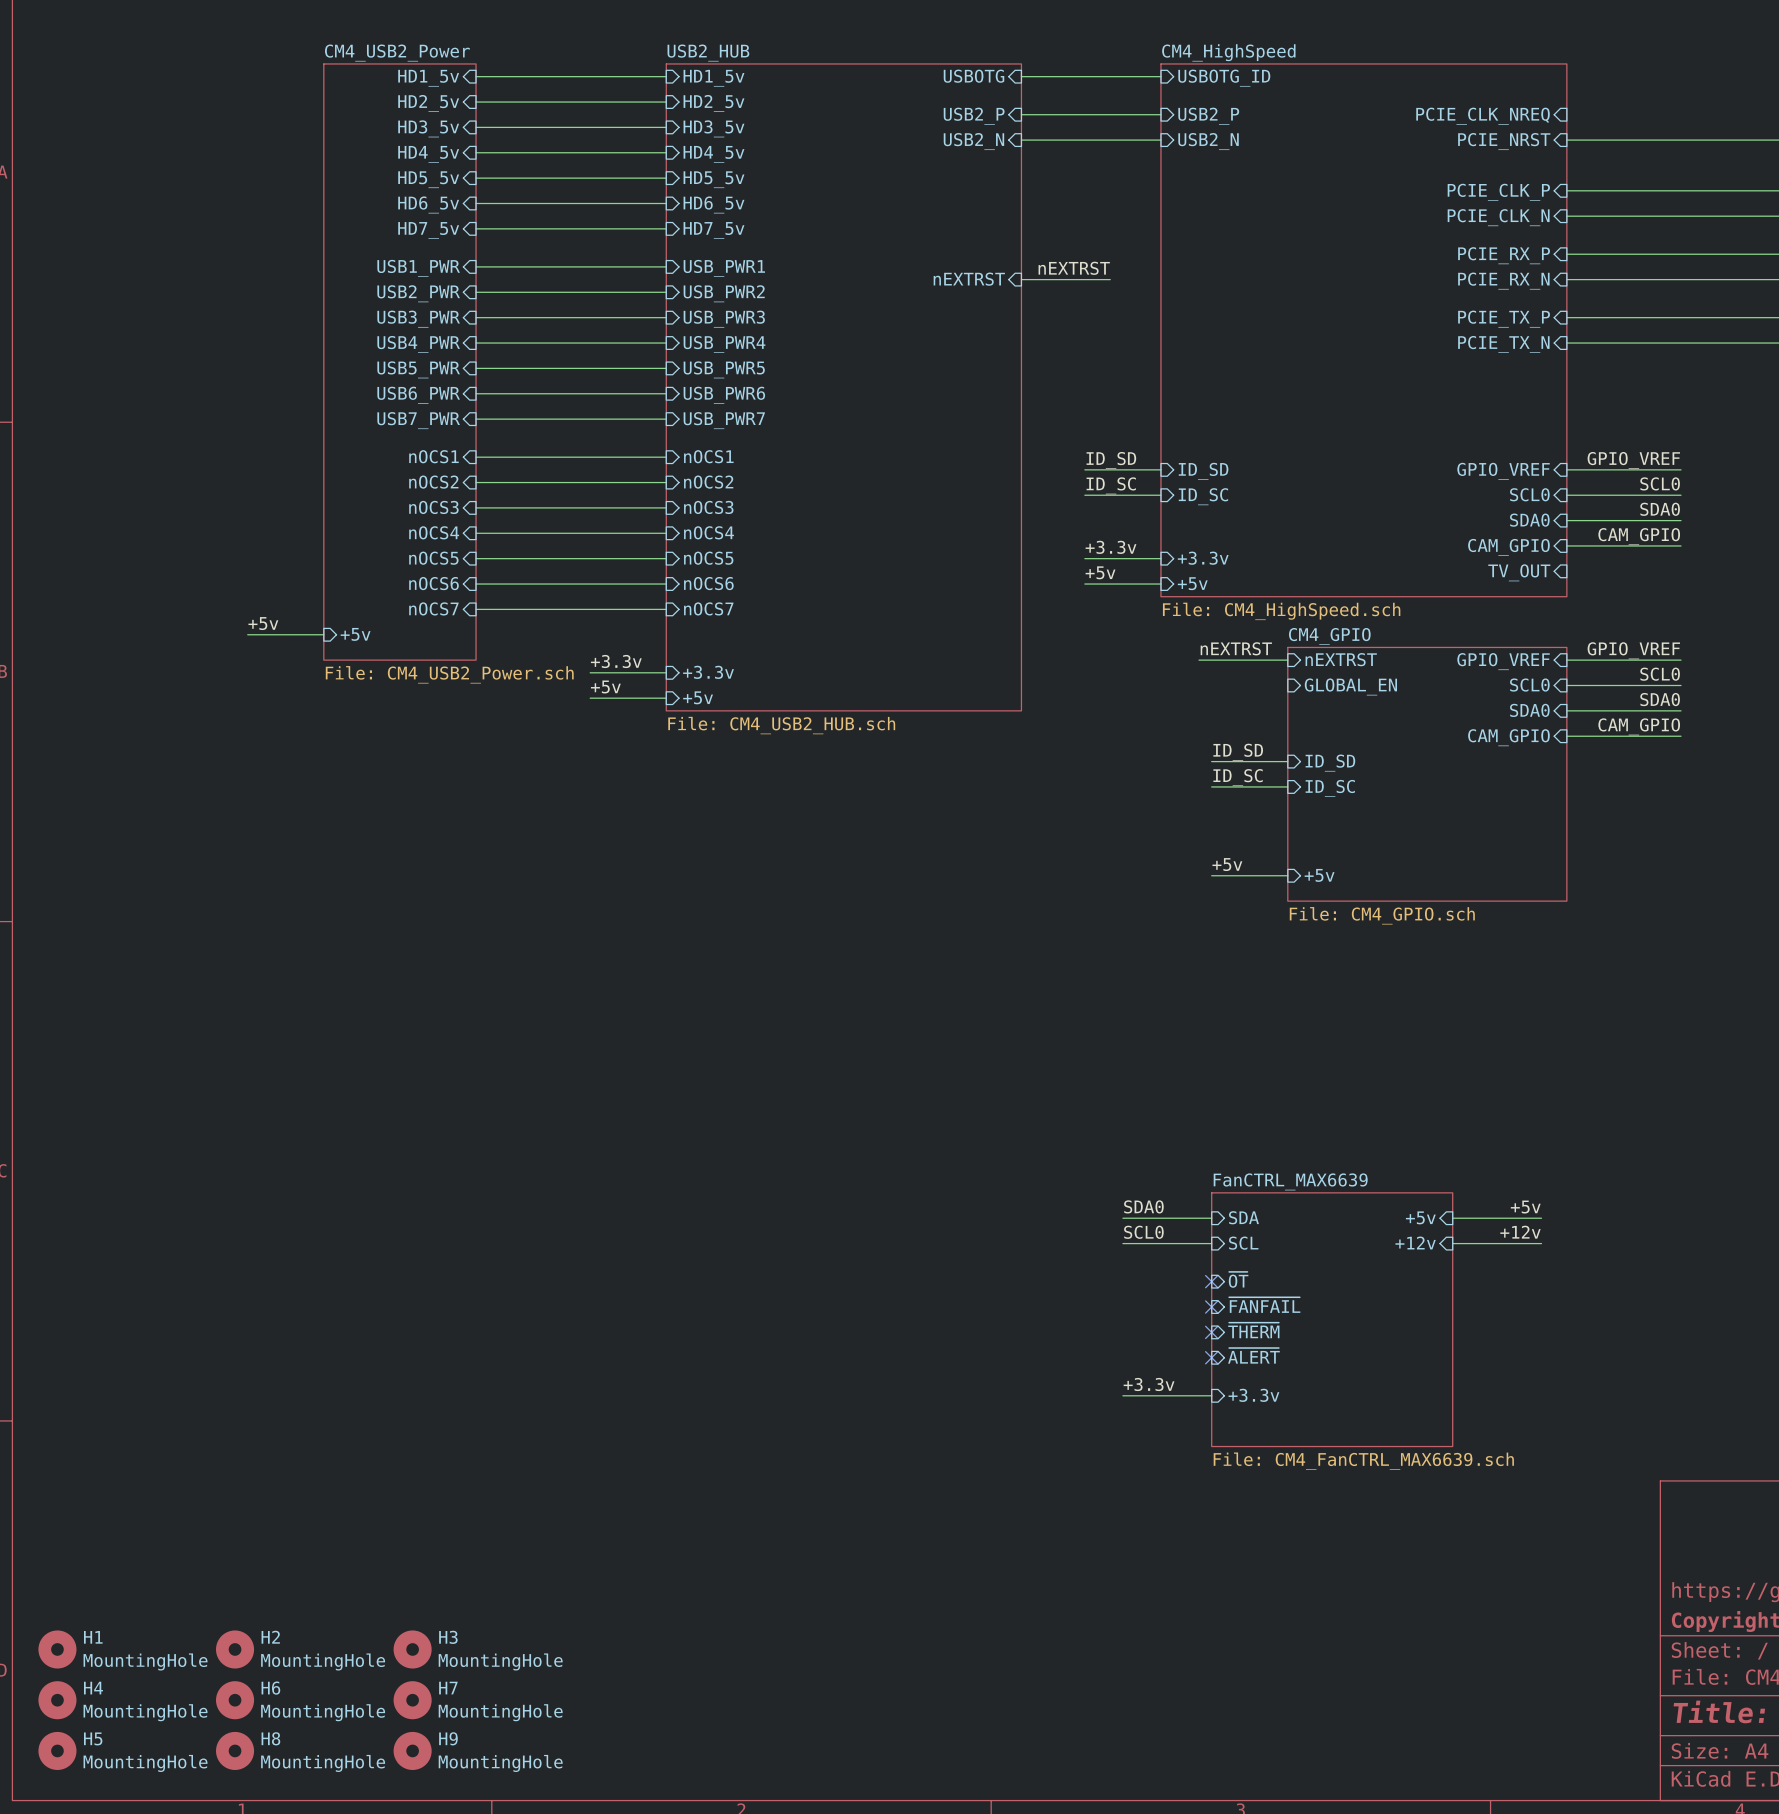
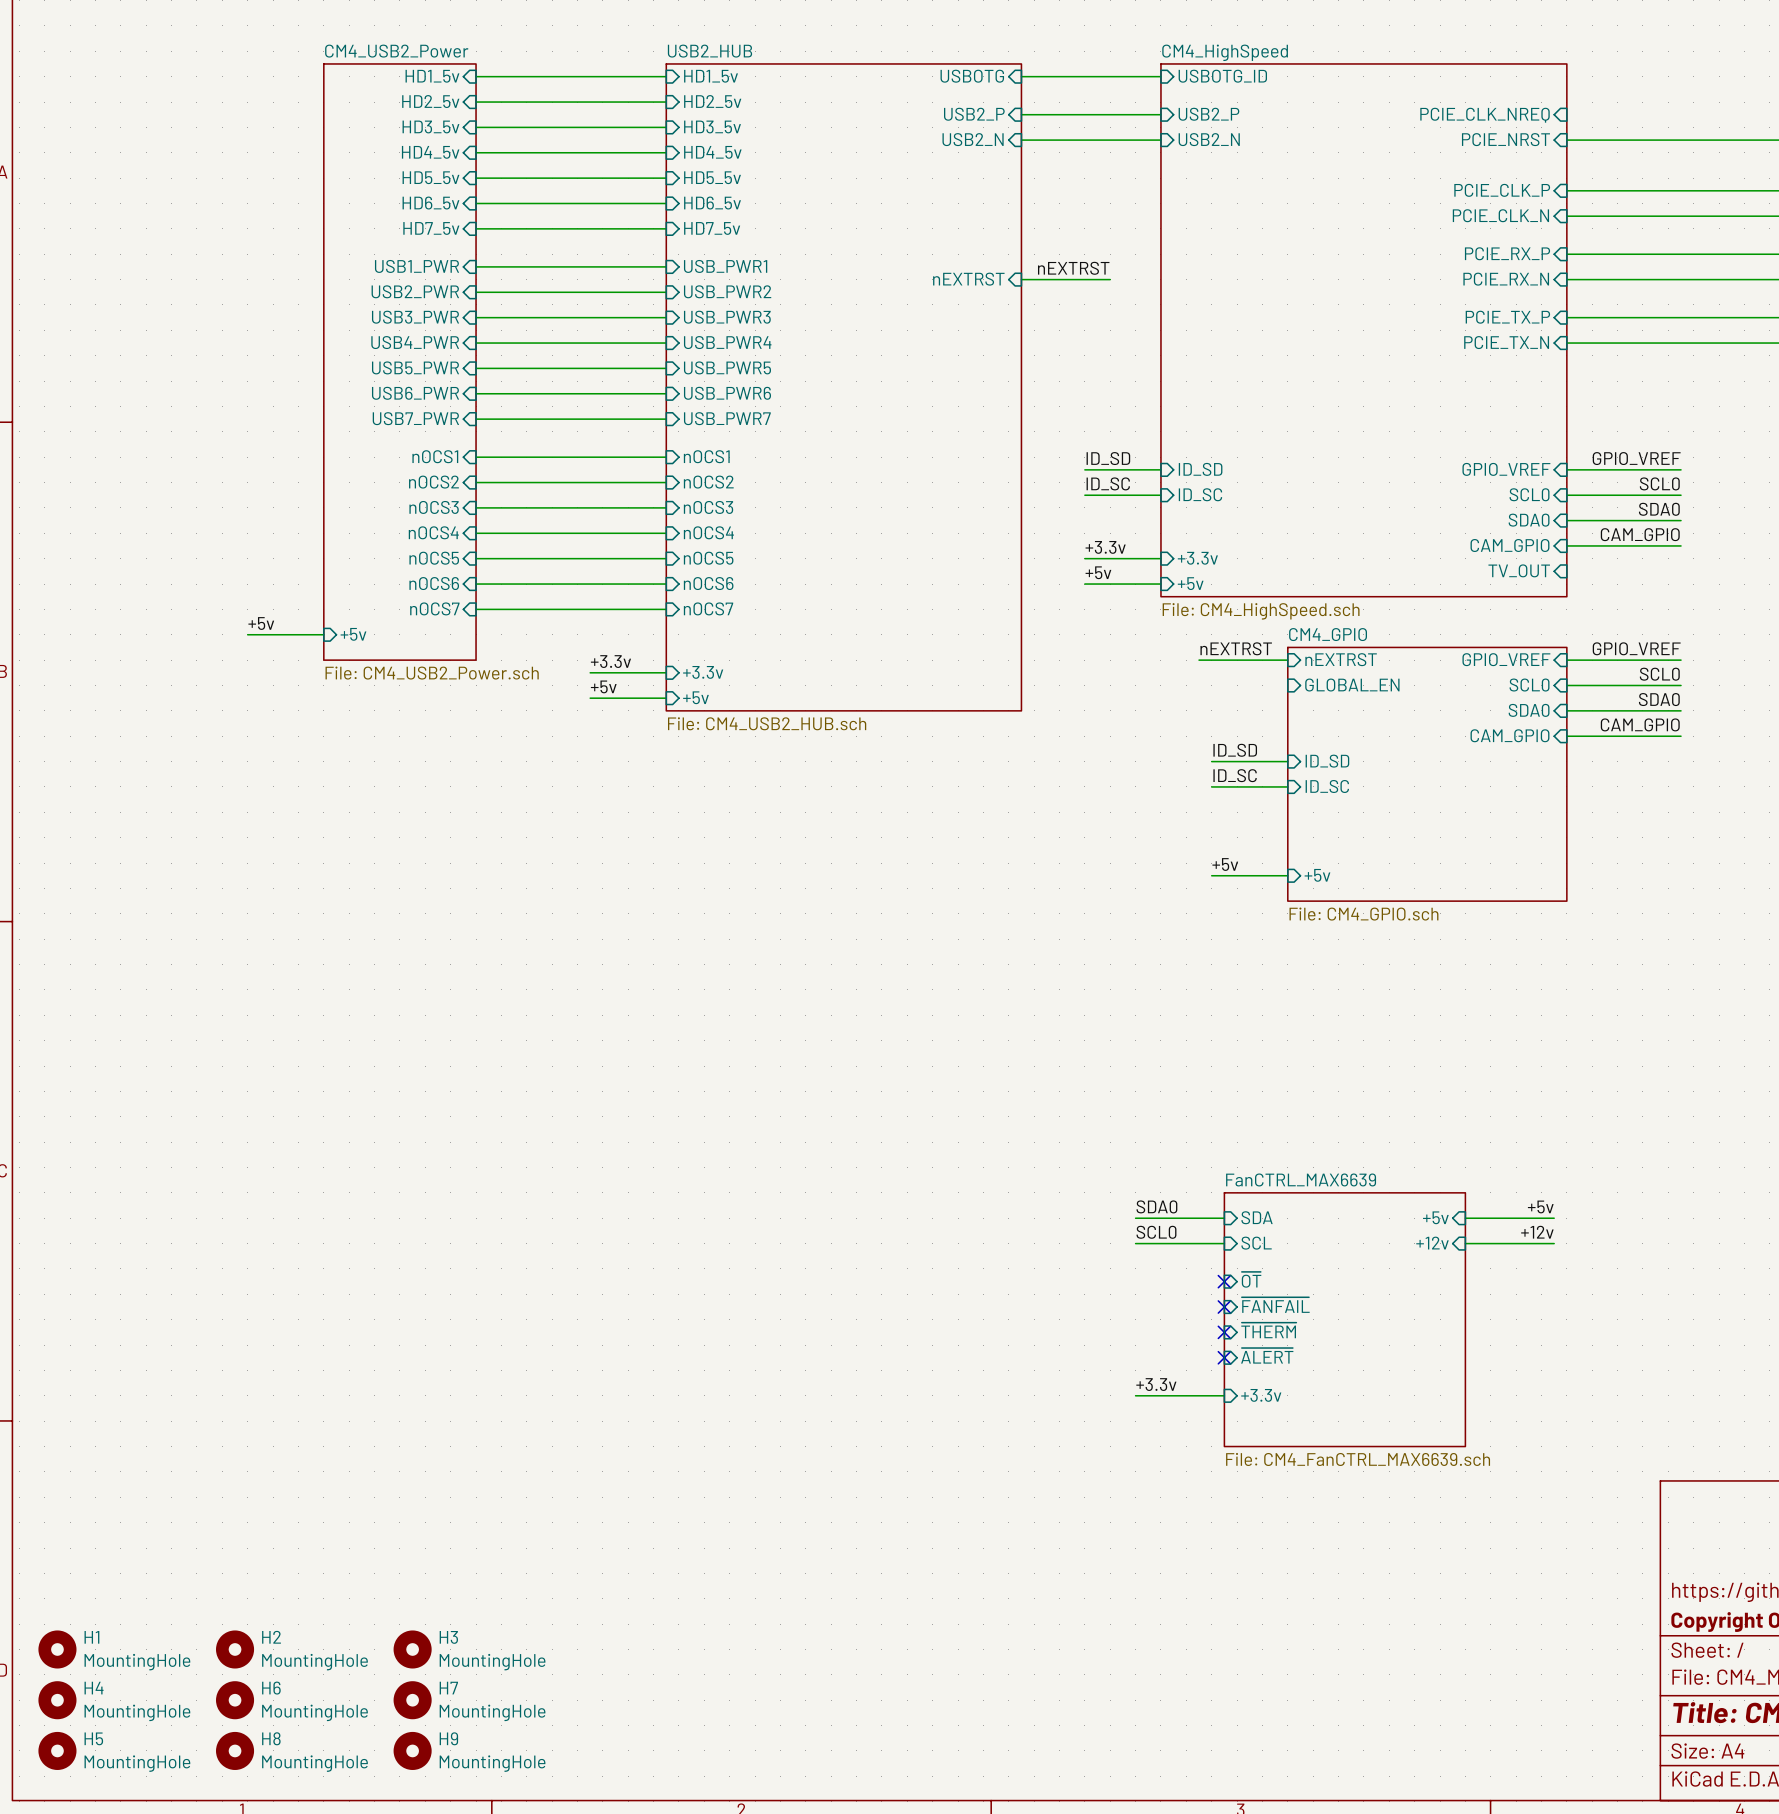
label position: SDA0 (1143, 1206) -> SDA0 (1156, 1206)
label position: +5v (1525, 1207) -> +5v (1540, 1206)
sheet pin position: SDA (1243, 1217) -> SDA (1257, 1217)
sheet pin position: +5v (1420, 1217) -> +5v (1435, 1217)
wire: (1122, 1218) (1135, 1218) -> (1211, 1218) (1224, 1218)
wire: (1452, 1218) (1465, 1218) -> (1541, 1218) (1554, 1218)
label position: SCL0 (1143, 1232) -> SCL0 (1156, 1232)
label position: +12v (1520, 1232) -> +12v (1537, 1232)
wire: (1122, 1243) (1135, 1243) -> (1211, 1243) (1224, 1243)
sheet pin position: SCL (1243, 1243) -> SCL (1256, 1243)
sheet pin position: +12v (1415, 1243) -> +12v (1432, 1243)
wire: (1452, 1243) (1465, 1243) -> (1541, 1243) (1554, 1243)
sheet pin position: ~{OT} (1238, 1279) -> ~{OT} (1251, 1279)
no-connect mark position: (1211, 1281) -> (1224, 1281)
sheet pin position: ~{FANFAIL} (1264, 1305) -> ~{FANFAIL} (1275, 1305)
no-connect mark position: (1211, 1307) -> (1224, 1307)
sheet FanCTRL_MAX6639 position: (1332, 1319) -> (1344, 1319)
sheet pin position: ~{THERM} (1253, 1330) -> ~{THERM} (1268, 1330)
no-connect mark position: (1211, 1332) -> (1224, 1332)
sheet pin position: ~{ALERT} (1253, 1355) -> ~{ALERT} (1267, 1355)
no-connect mark position: (1211, 1357) -> (1224, 1357)
label position: +3.3v (1149, 1384) -> +3.3v (1156, 1384)
wire: (1122, 1395) (1135, 1395) -> (1211, 1395) (1224, 1395)
sheet pin position: +3.3v (1253, 1395) -> +3.3v (1261, 1395)

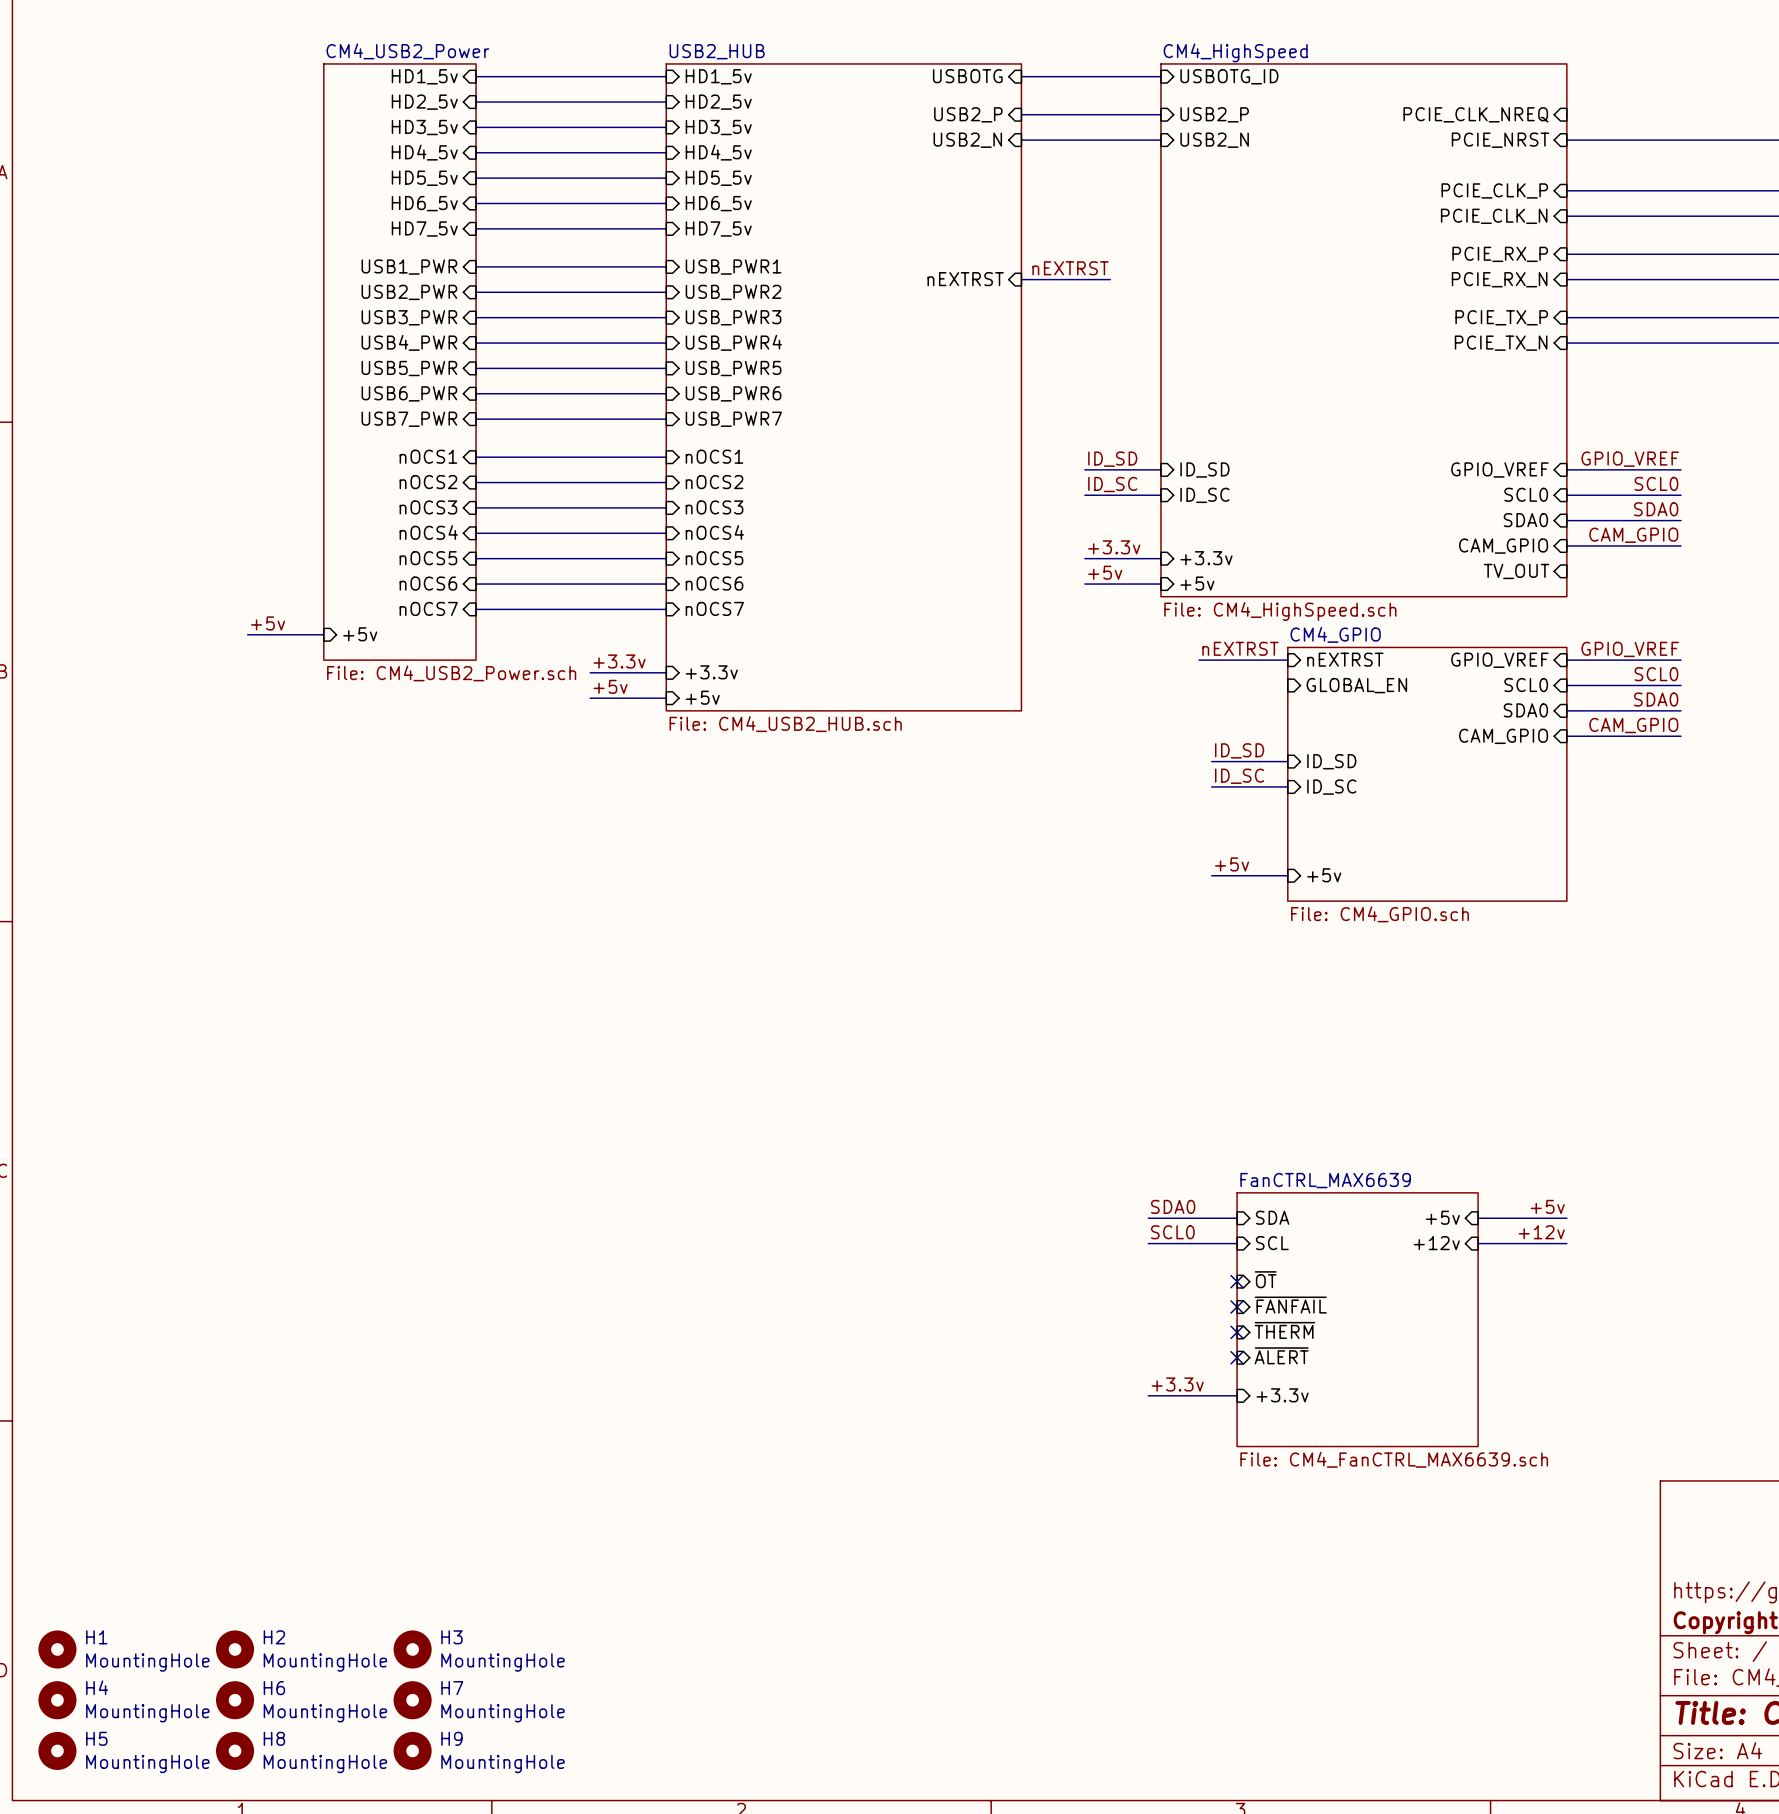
label position: SDA0 (1156, 1206) -> SDA0 (1173, 1206)
label position: +5v (1540, 1206) -> +5v (1547, 1206)
sheet pin position: SDA (1257, 1217) -> SDA (1272, 1217)
sheet pin position: +5v (1435, 1217) -> +5v (1442, 1217)
wire: (1135, 1218) (1148, 1218) -> (1224, 1218) (1237, 1218)
wire: (1465, 1218) (1478, 1218) -> (1554, 1218) (1566, 1218)
label position: SCL0 (1156, 1232) -> SCL0 (1172, 1232)
label position: +12v (1537, 1232) -> +12v (1541, 1232)
wire: (1135, 1243) (1148, 1243) -> (1224, 1243) (1237, 1243)
sheet pin position: SCL (1256, 1243) -> SCL (1272, 1243)
sheet pin position: +12v (1432, 1243) -> +12v (1436, 1243)
wire: (1465, 1243) (1478, 1243) -> (1554, 1243) (1566, 1243)
sheet pin position: ~{OT} (1251, 1279) -> ~{OT} (1265, 1279)
no-connect mark position: (1224, 1281) -> (1237, 1281)
sheet pin position: ~{FANFAIL} (1275, 1305) -> ~{FANFAIL} (1290, 1305)
no-connect mark position: (1224, 1307) -> (1237, 1307)
sheet FanCTRL_MAX6639 position: (1344, 1319) -> (1357, 1319)
sheet pin position: ~{THERM} (1268, 1330) -> ~{THERM} (1284, 1330)
no-connect mark position: (1224, 1332) -> (1237, 1332)
sheet pin position: ~{ALERT} (1267, 1355) -> ~{ALERT} (1281, 1355)
no-connect mark position: (1224, 1357) -> (1237, 1357)
label position: +3.3v (1156, 1384) -> +3.3v (1177, 1384)
wire: (1135, 1395) (1148, 1395) -> (1224, 1395) (1237, 1395)
sheet pin position: +3.3v (1261, 1395) -> +3.3v (1282, 1395)

